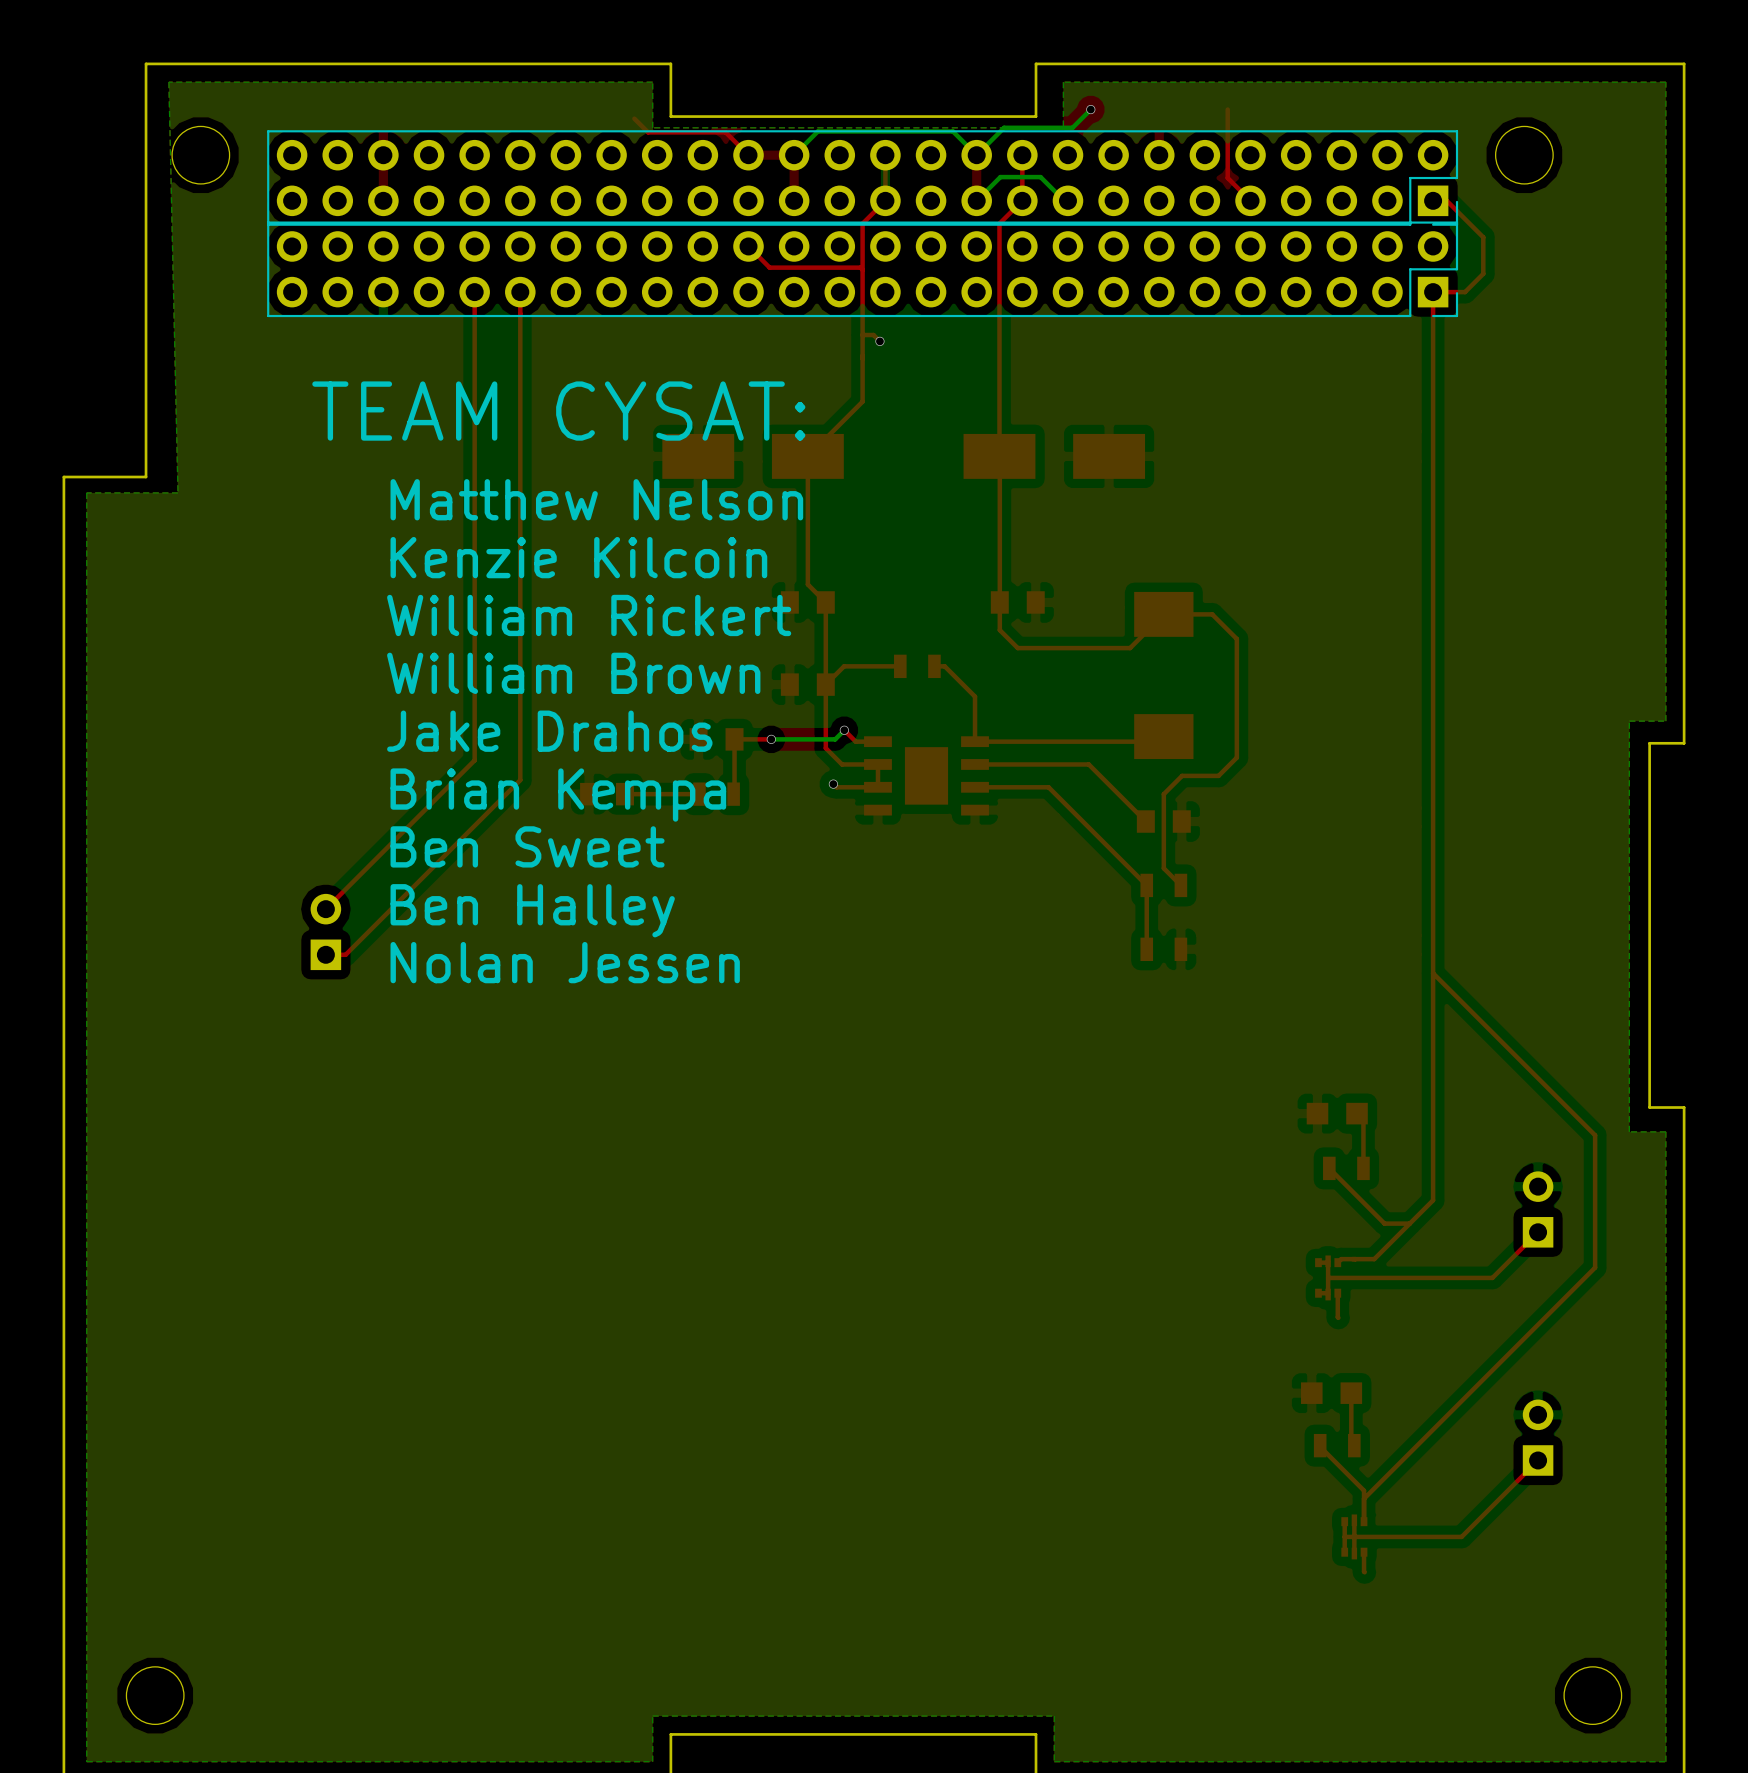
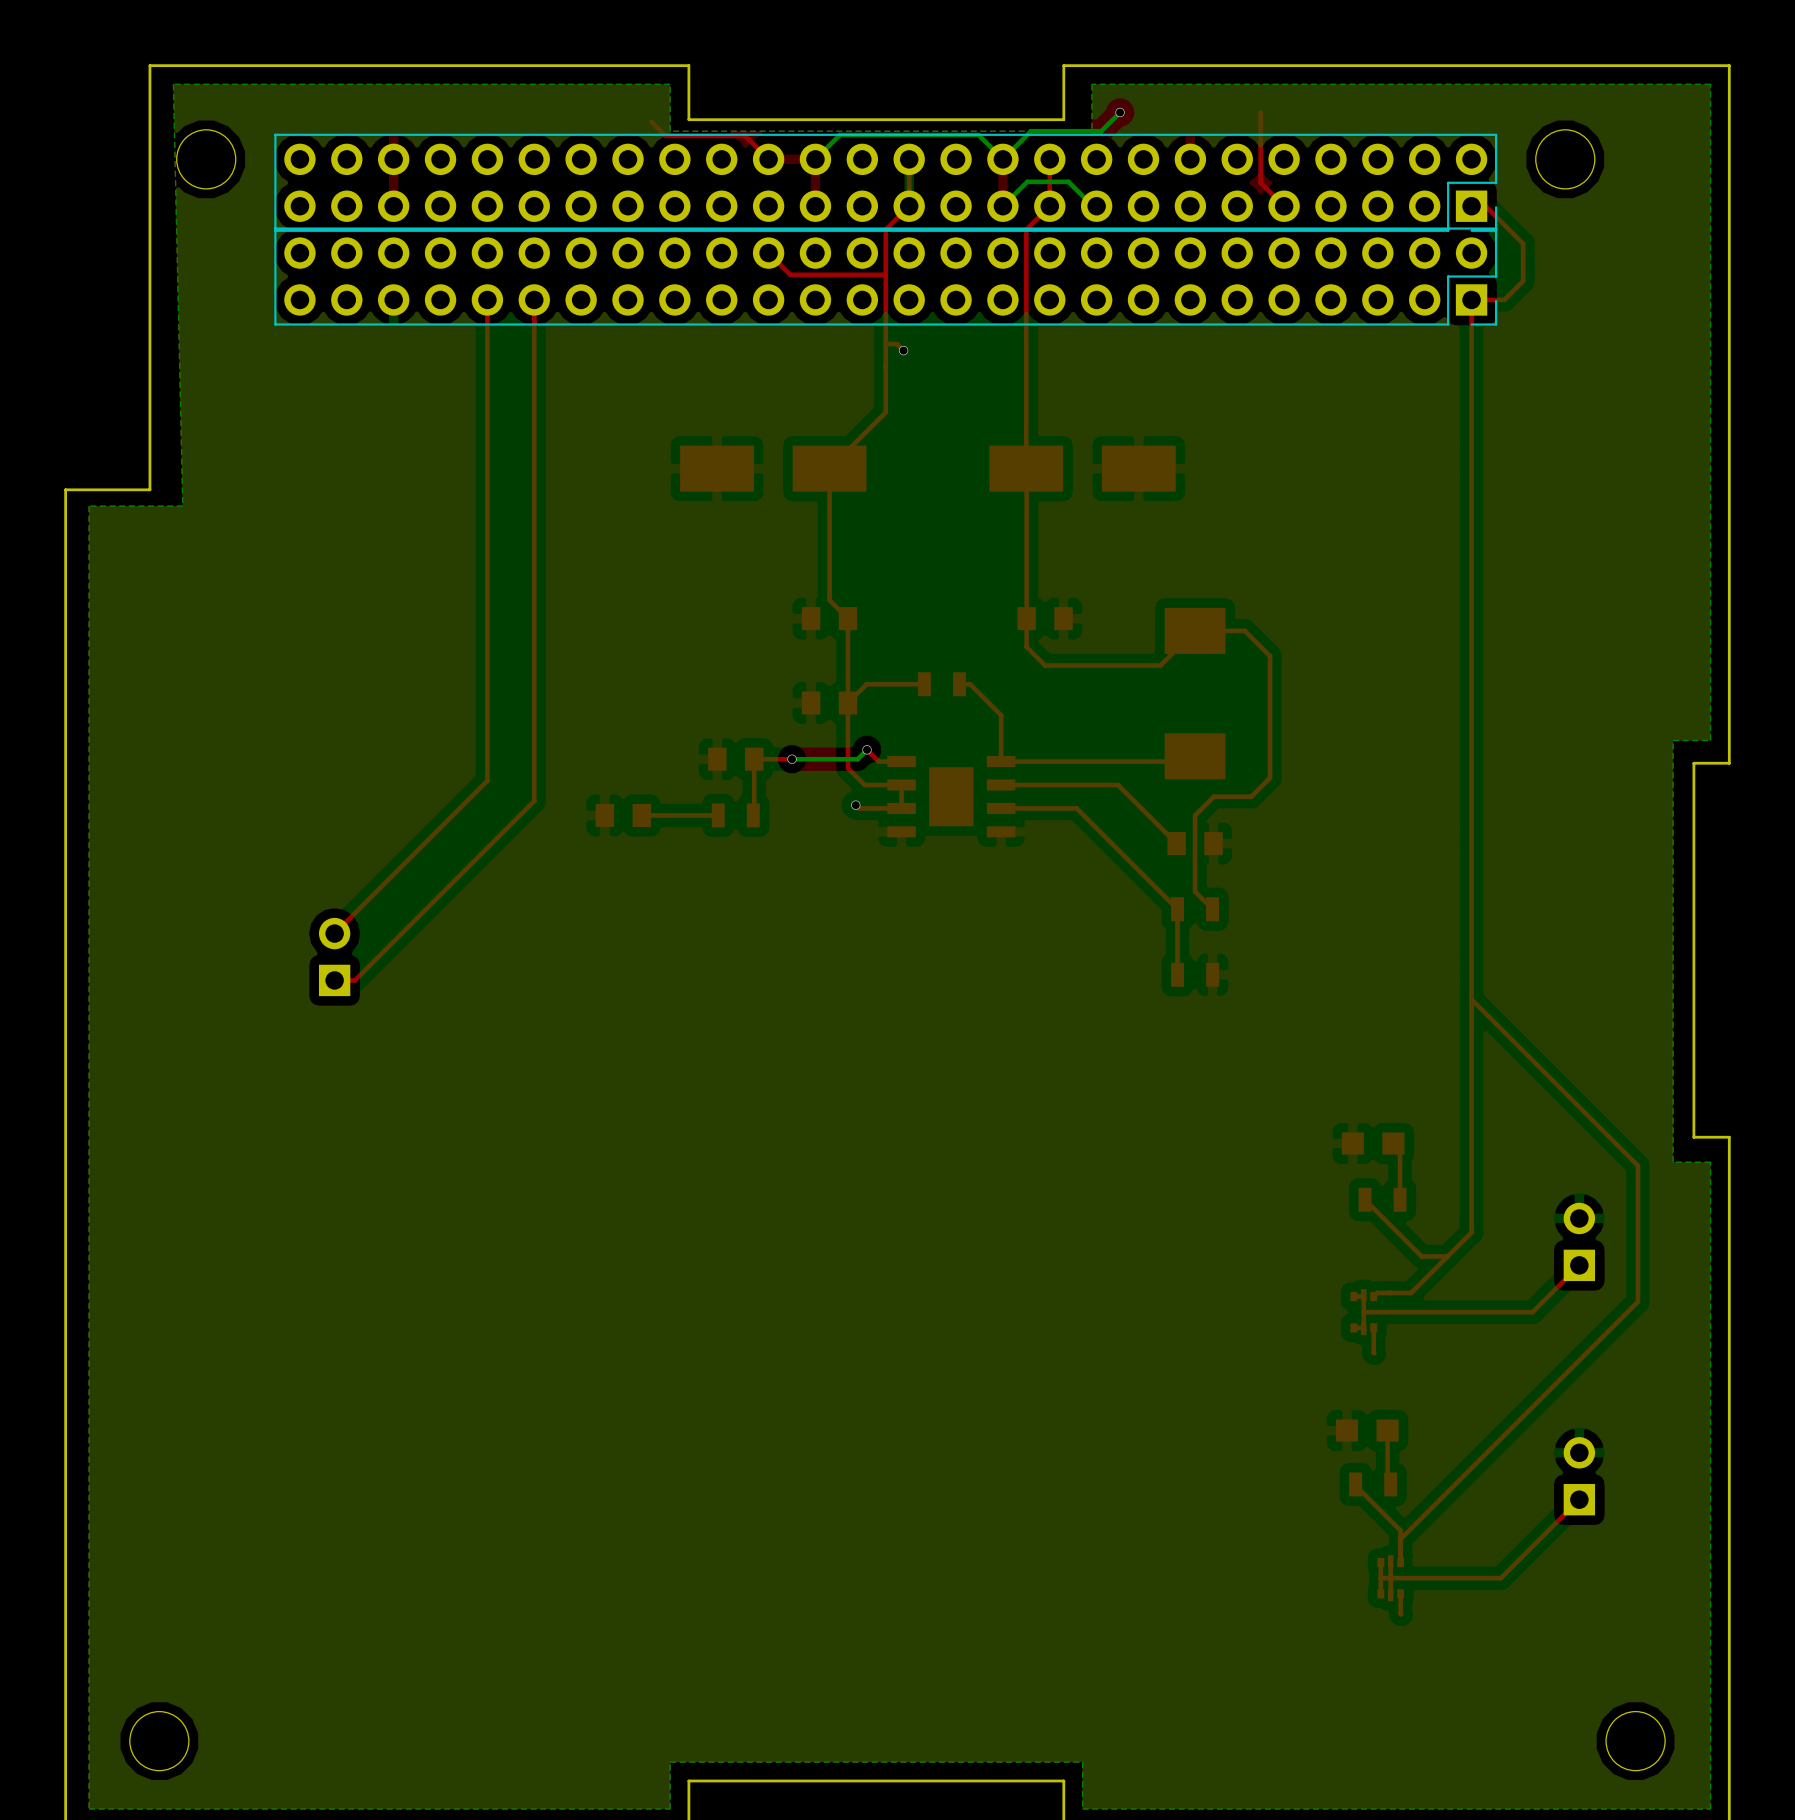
text: TEAM CYSAT: (558, 411) -> none
text: Matthew Nelson (596, 499) -> none
text: Kenzie Kilcoin (578, 557) -> none
text: William Rickert (589, 615) -> none
text: William Brown (573, 673) -> none
text: Jake Drahos (549, 731) -> none
text: Brian Kempa (558, 795) -> none
text: Ben Sweet (527, 846) -> none
text: Ben Halley (532, 910) -> none
text: Nolan Jessen (565, 962) -> none

